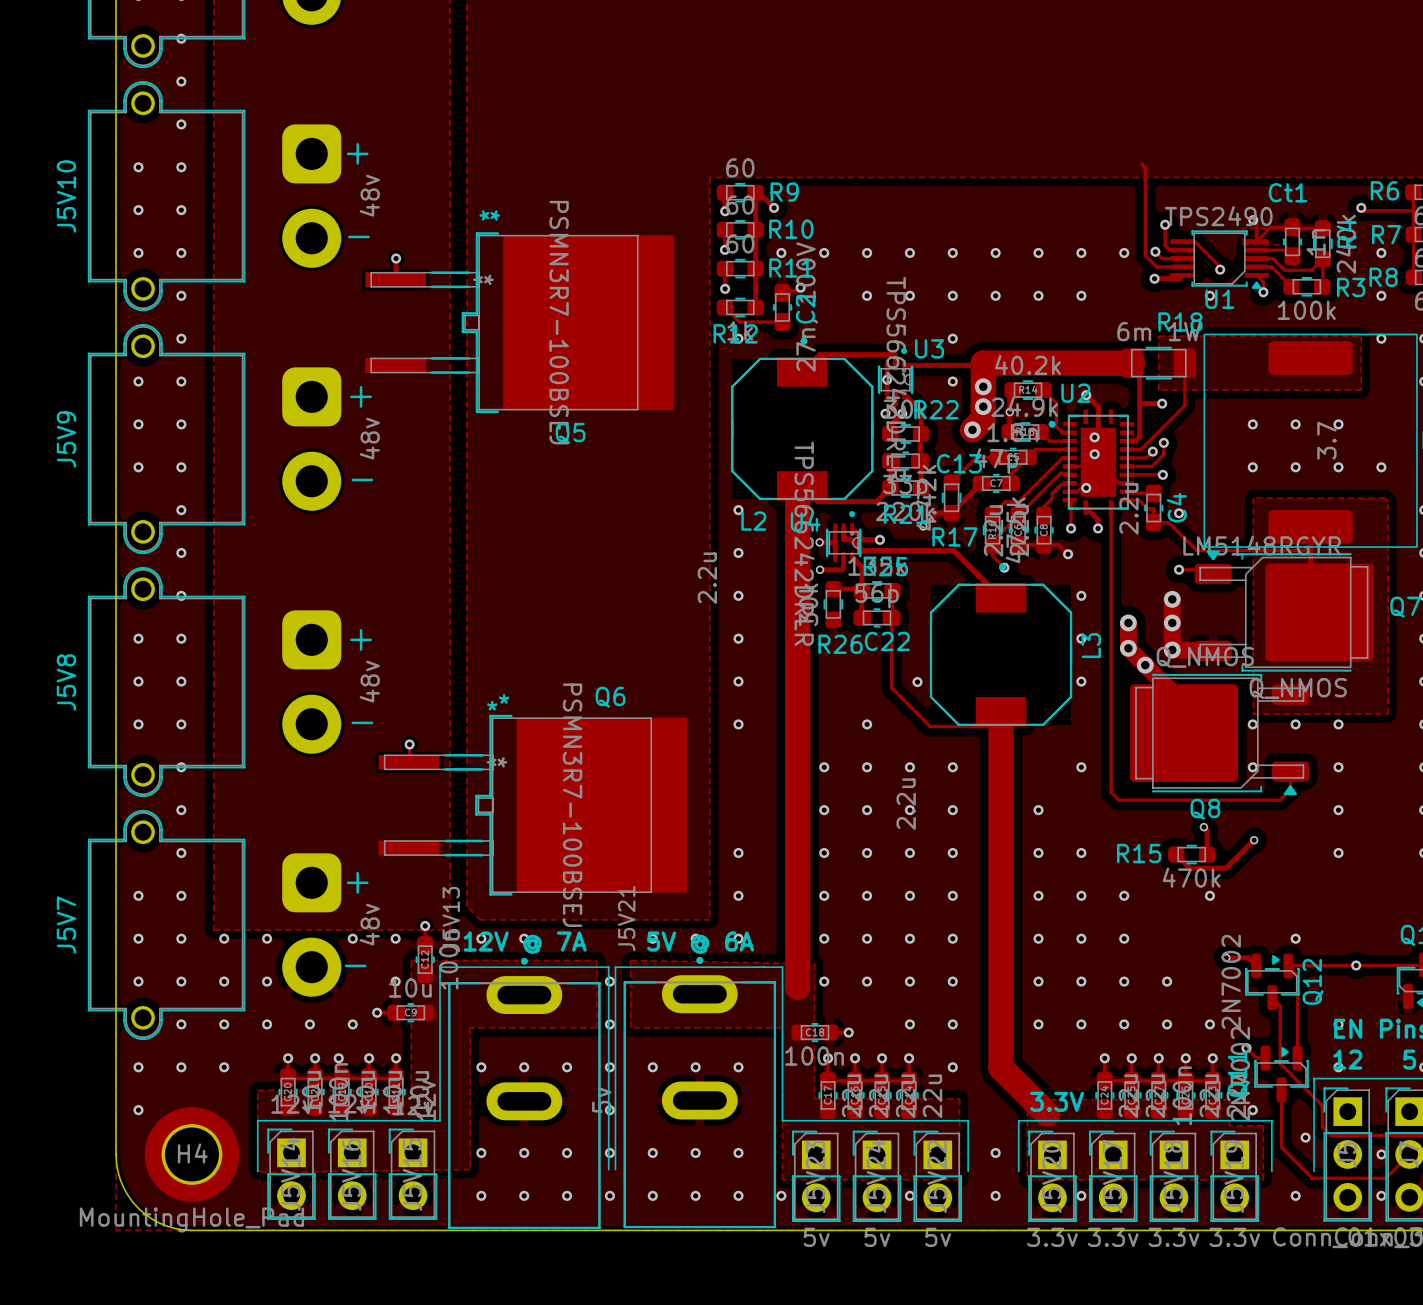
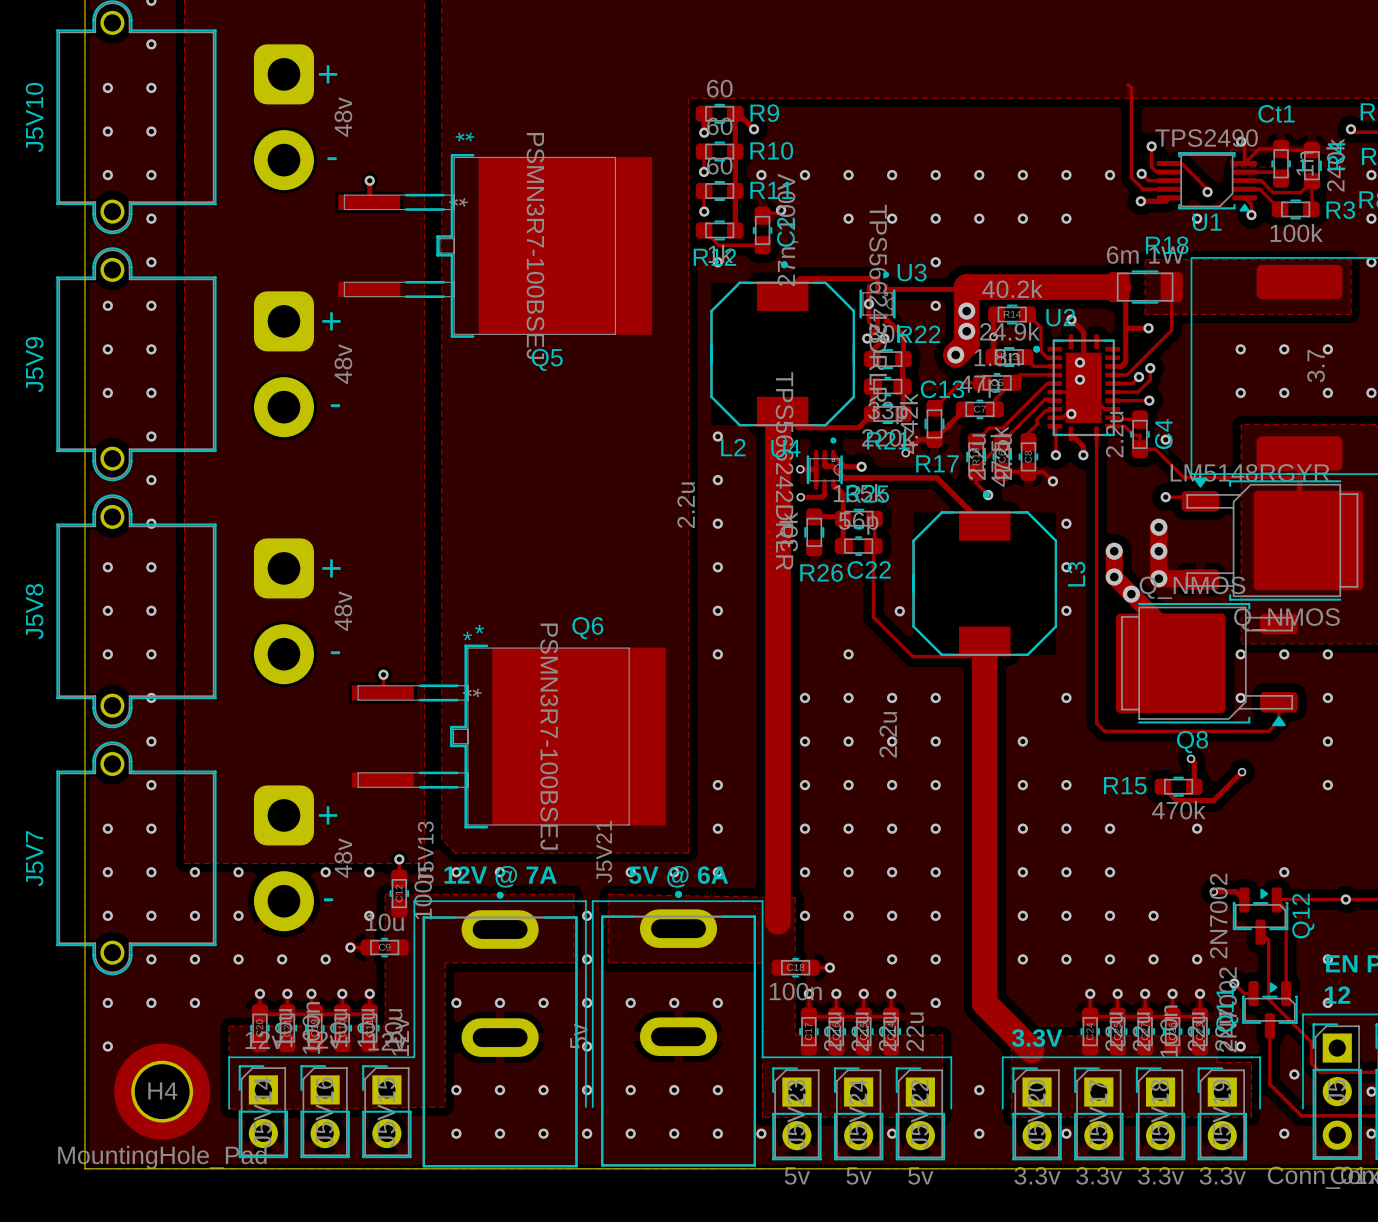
board edge: (116, 1154) (117, 1171) (123, 1187) (138, 1208) (151, 1218) (166, 1226) (191, 1230) -> (84, 1091) (84, 1168) (162, 1168)

